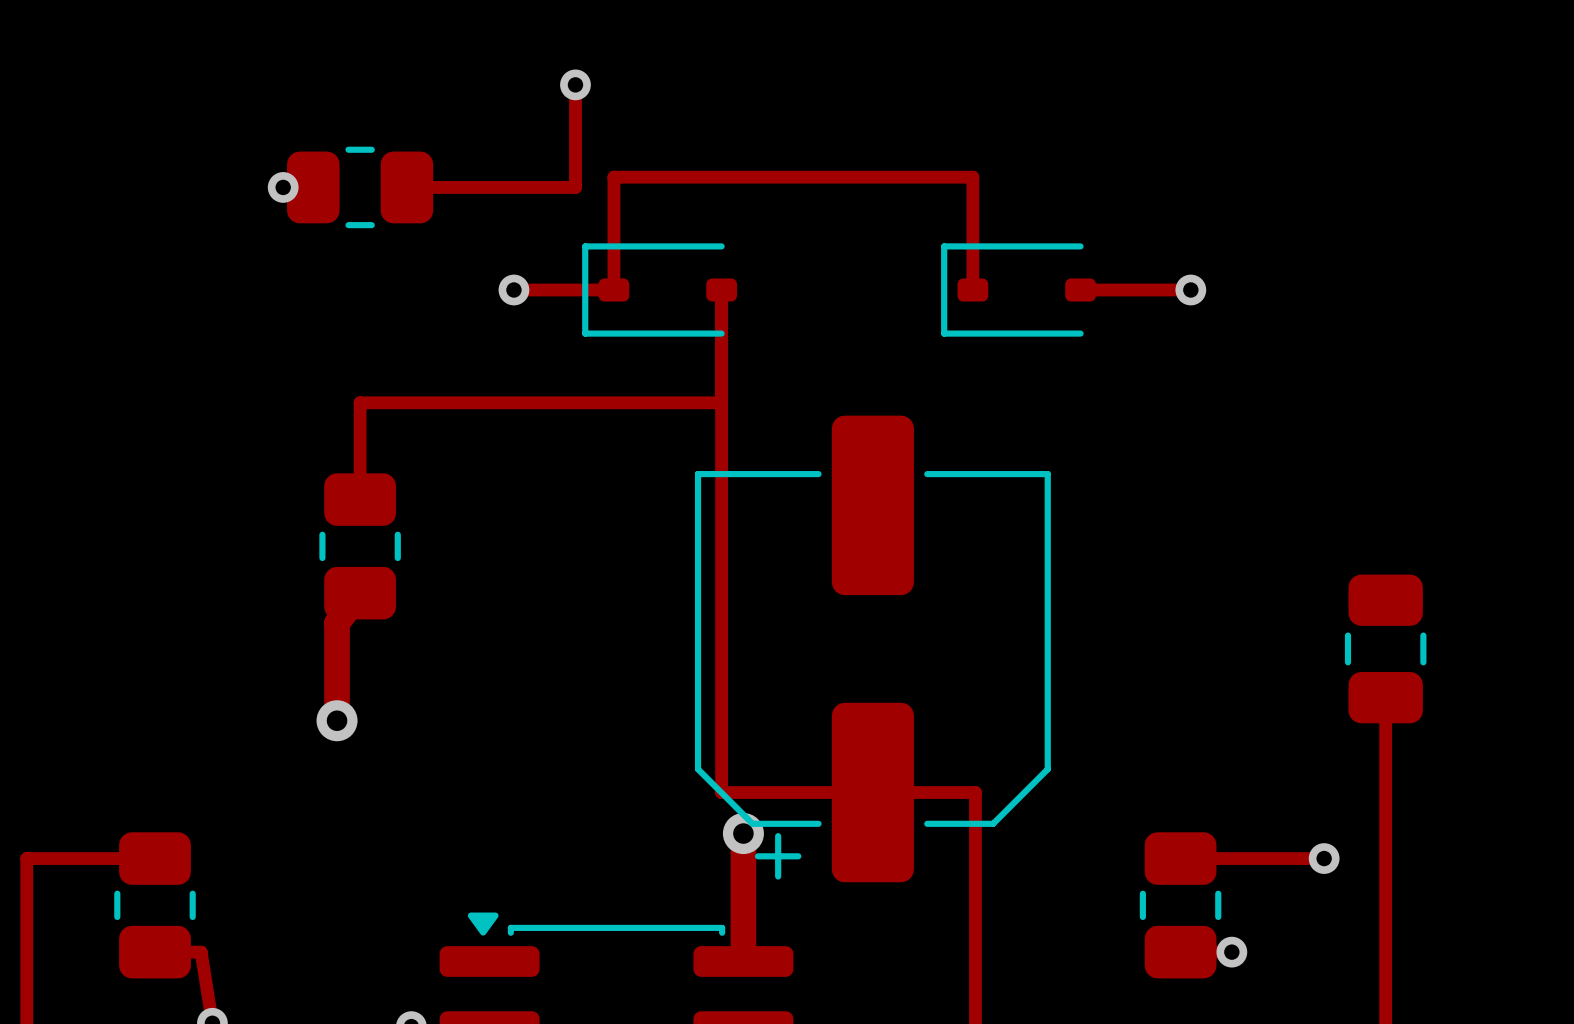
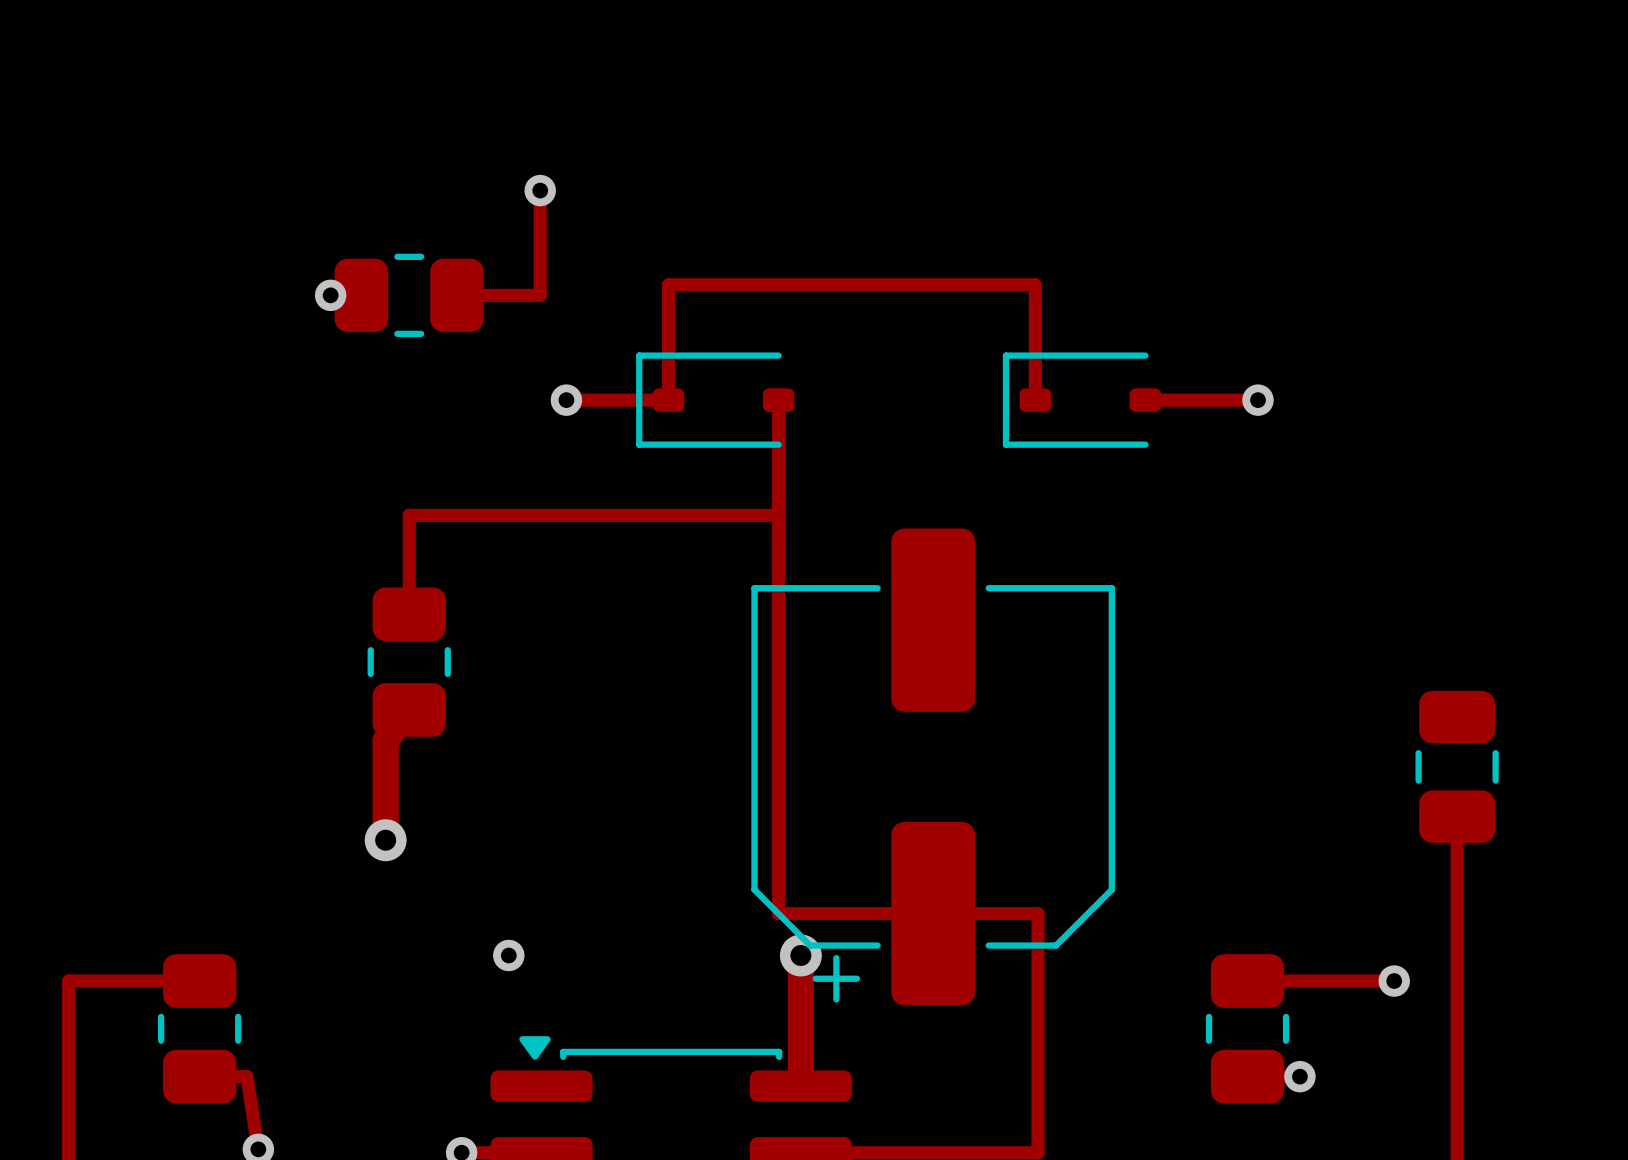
track: (575, 84) (575, 187) (488, 187) -> (540, 190) (540, 295)
via position: (575, 84) -> (540, 190)
via: none -> (508, 955)

